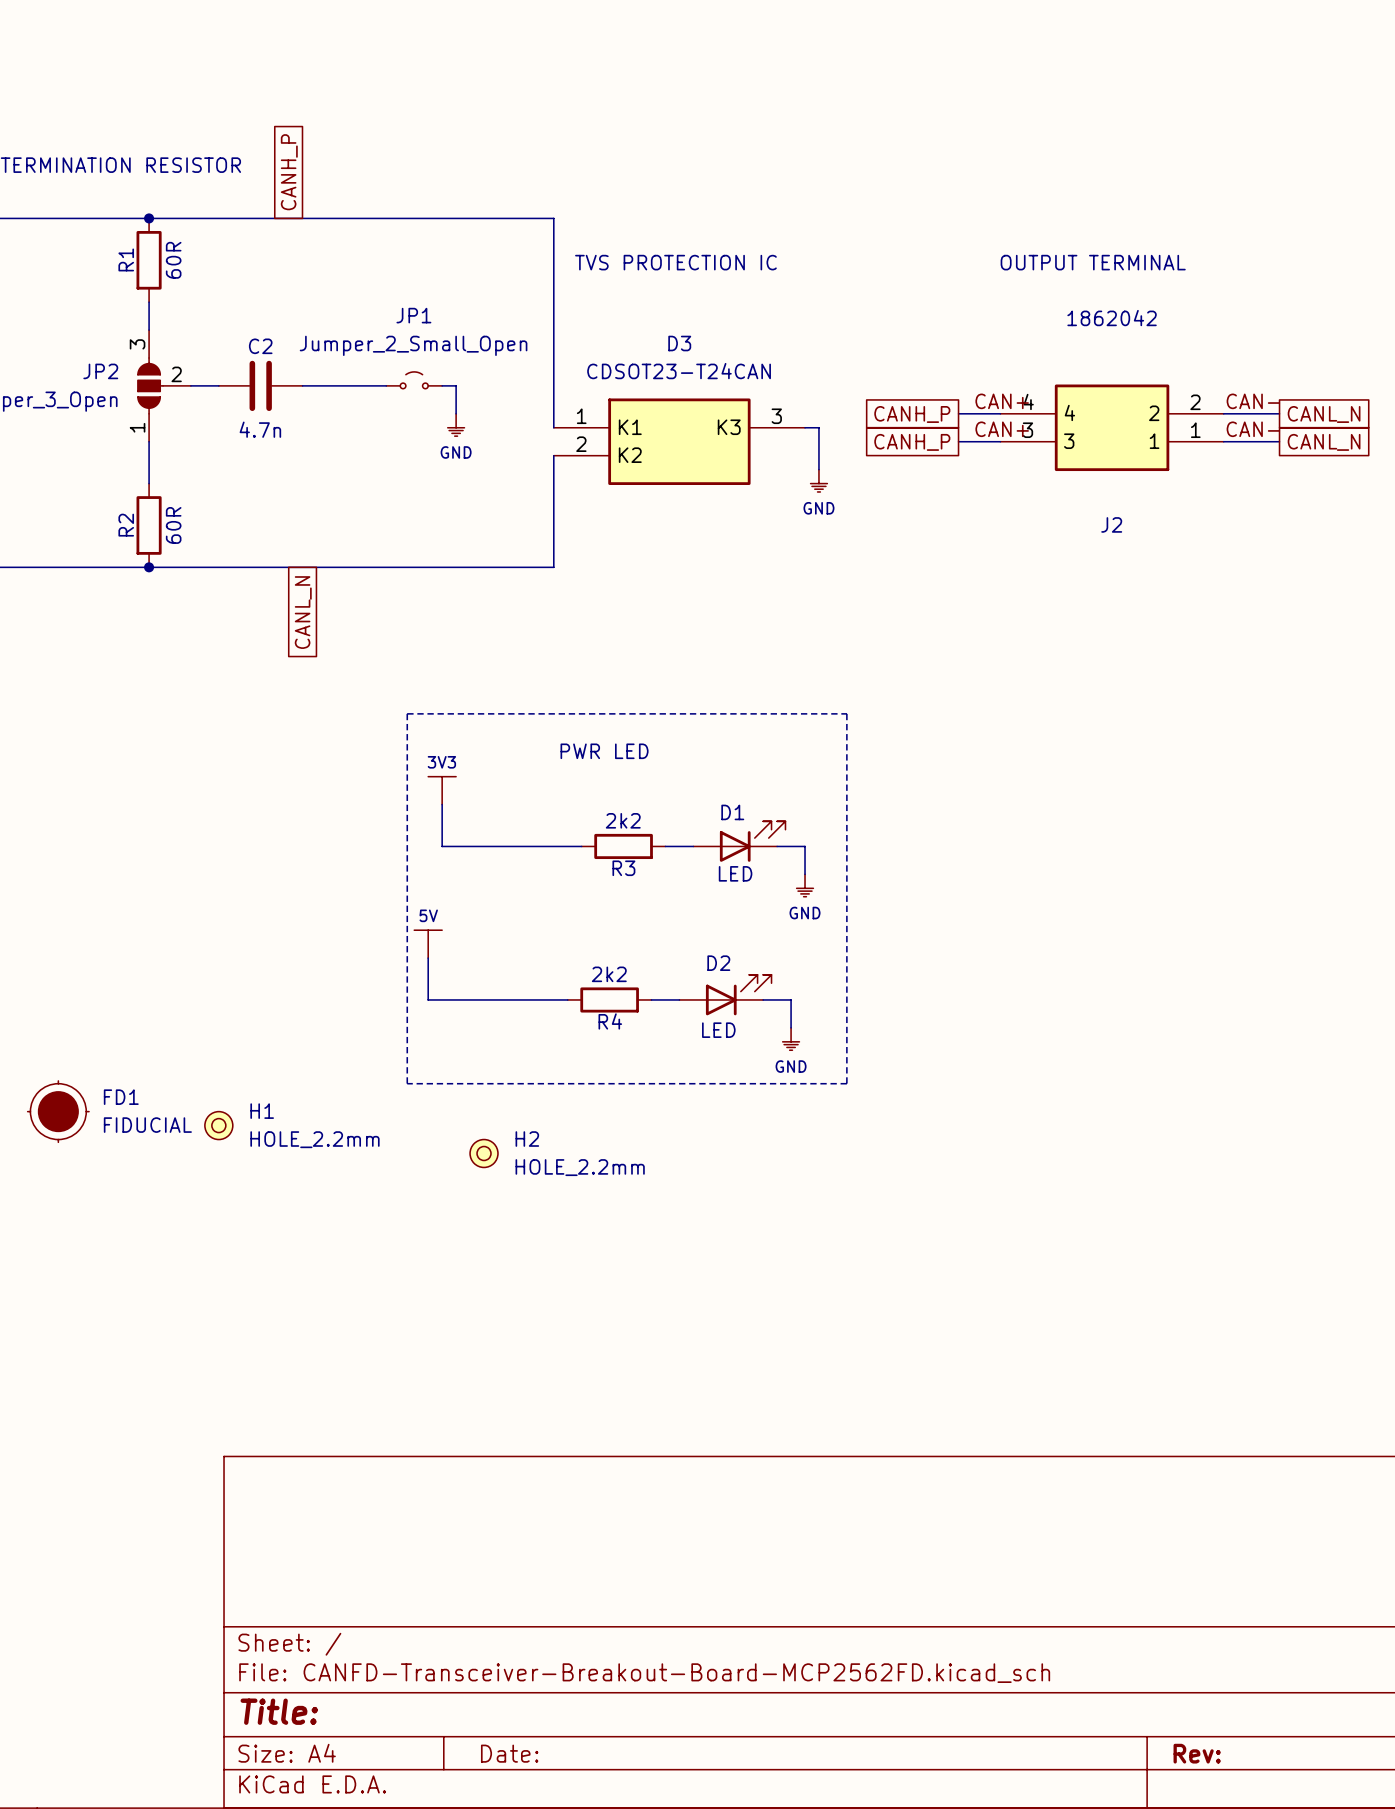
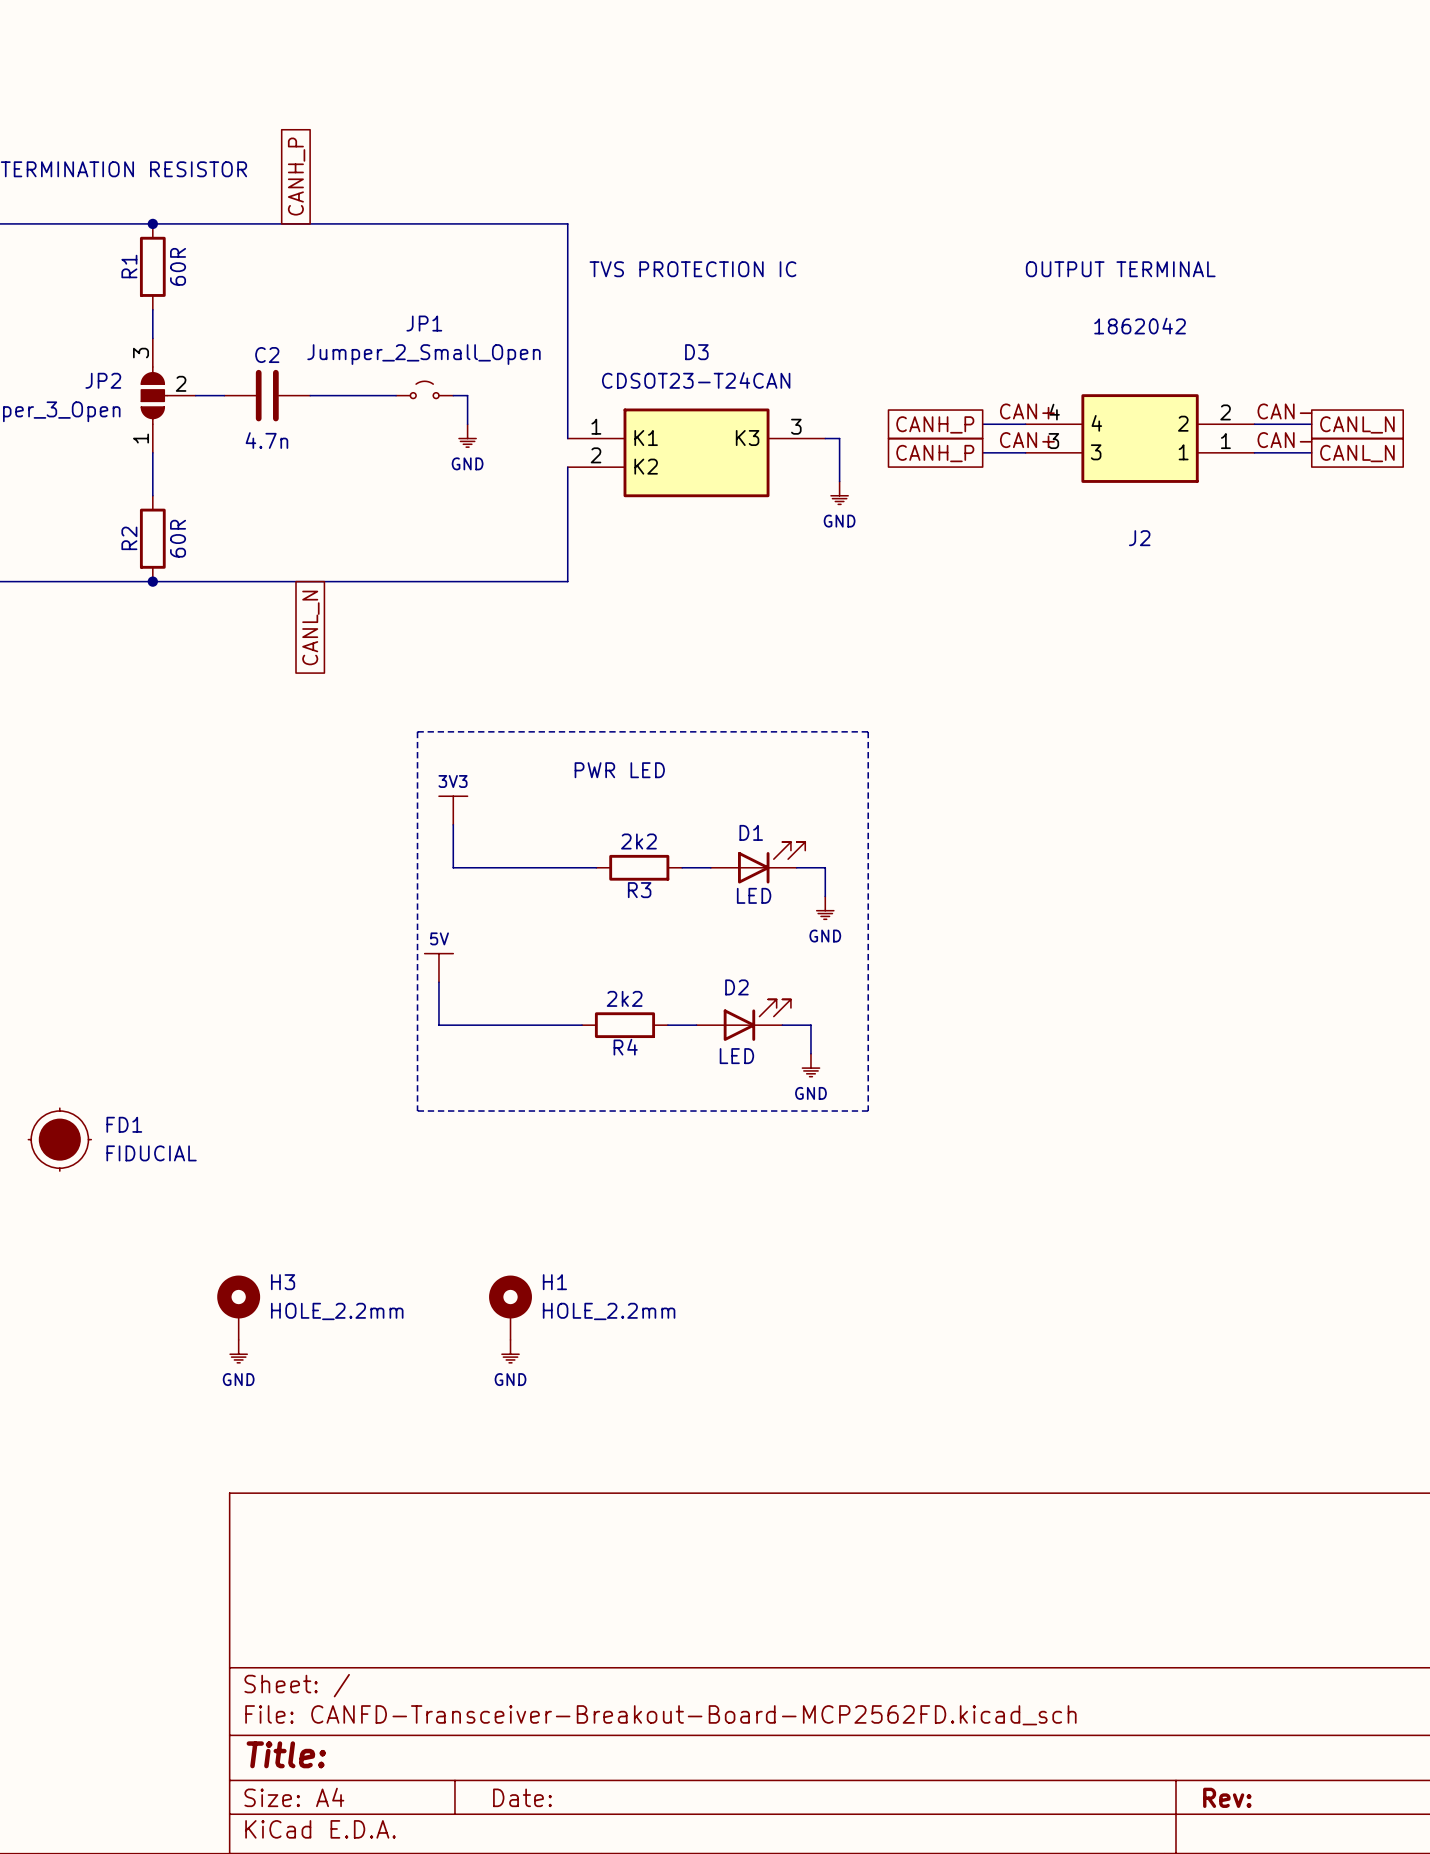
H1 symbol: [204, 1111, 233, 1140] -> [489, 1275, 532, 1340]
H2: HOLE_2.2mm (484, 1153) -> none
H3: none -> HOLE_2.2mm (238, 1307)
power symbol: none -> GND (238, 1351)
power symbol: none -> GND (510, 1351)

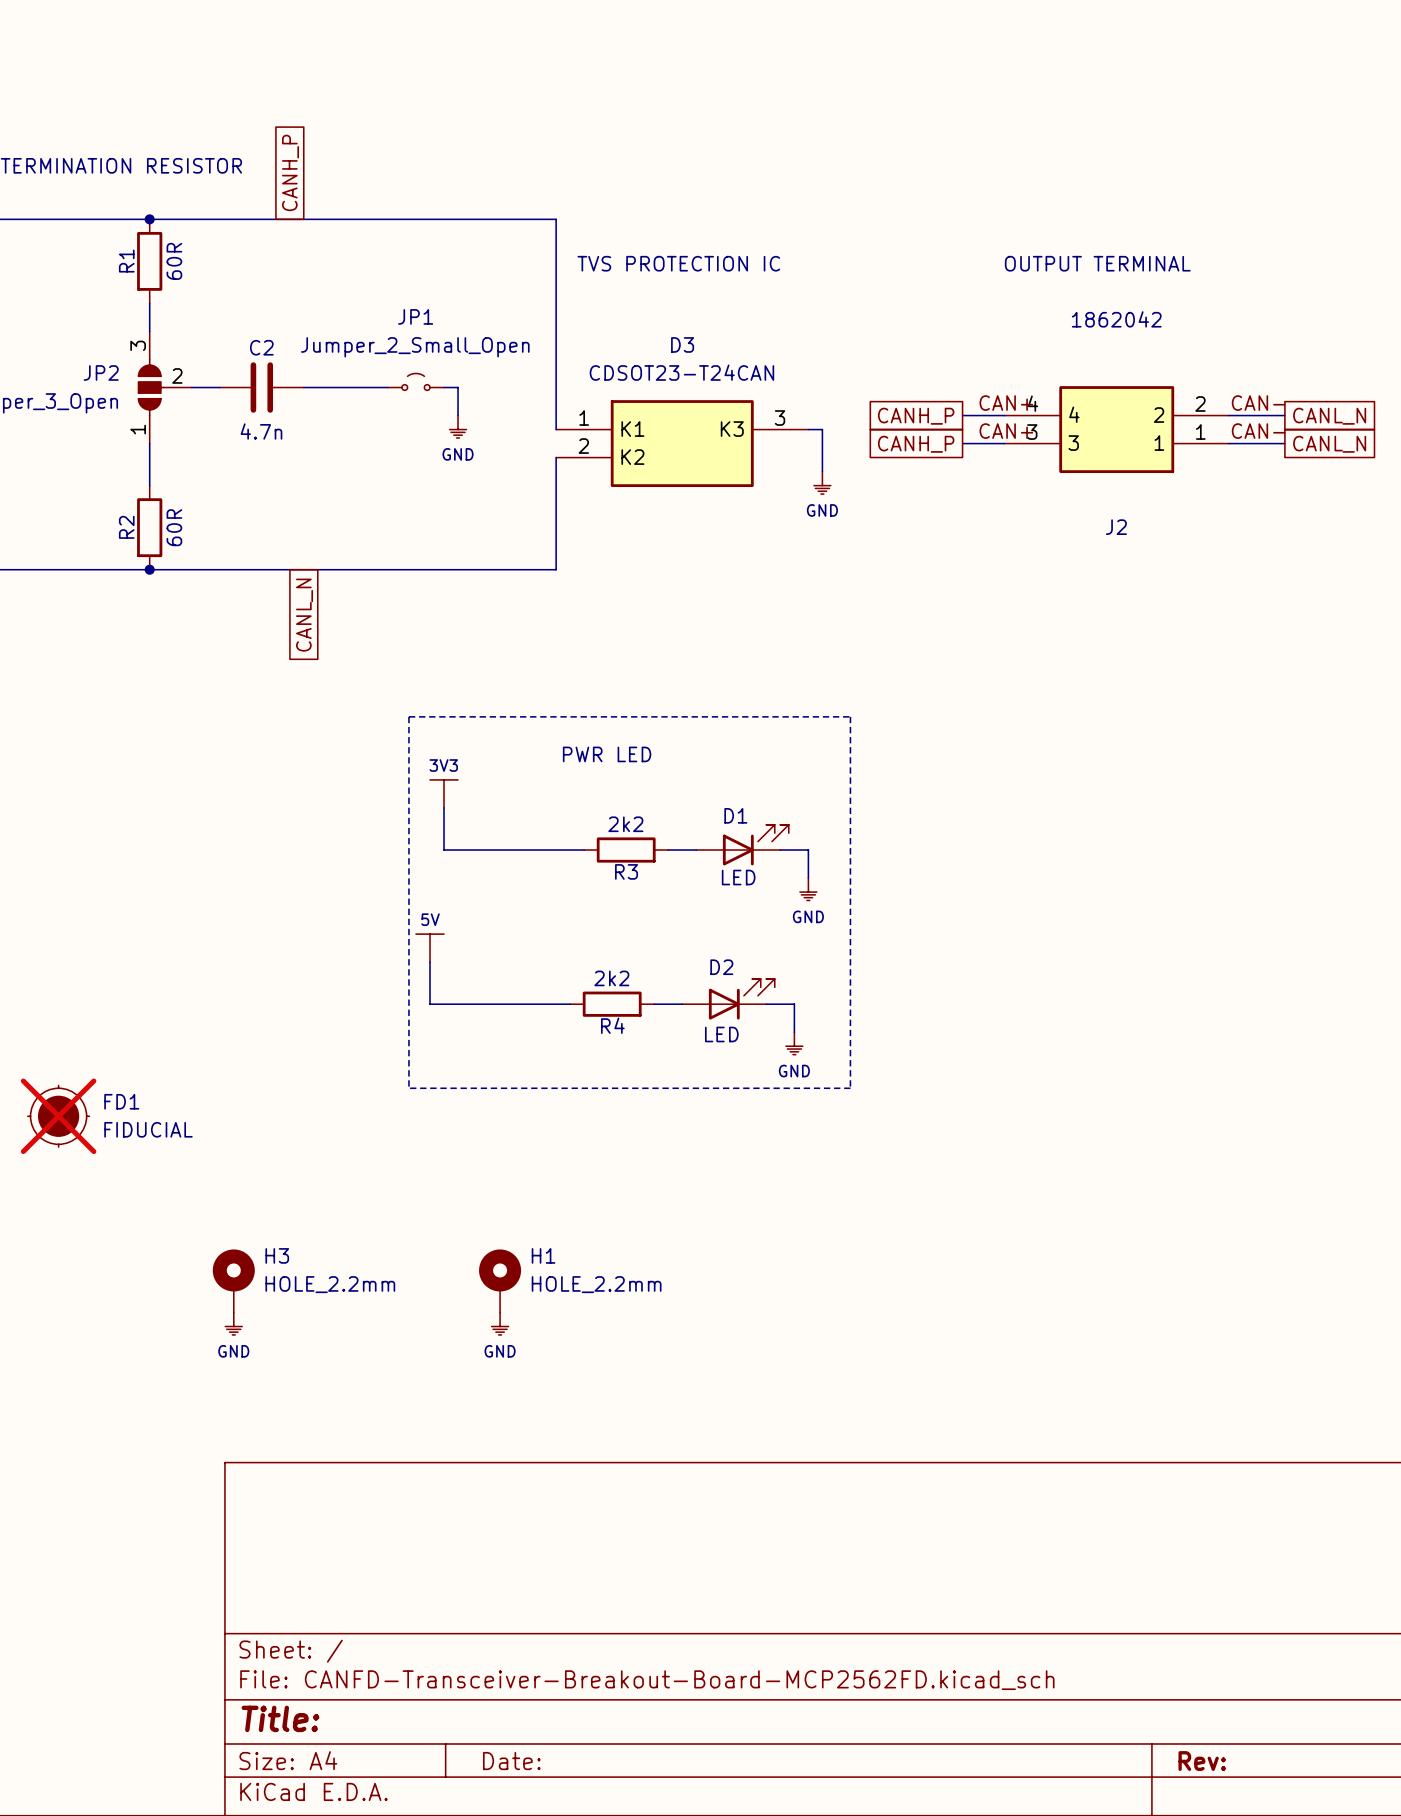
FD1 do-not-place cross: none -> (58, 1116)

